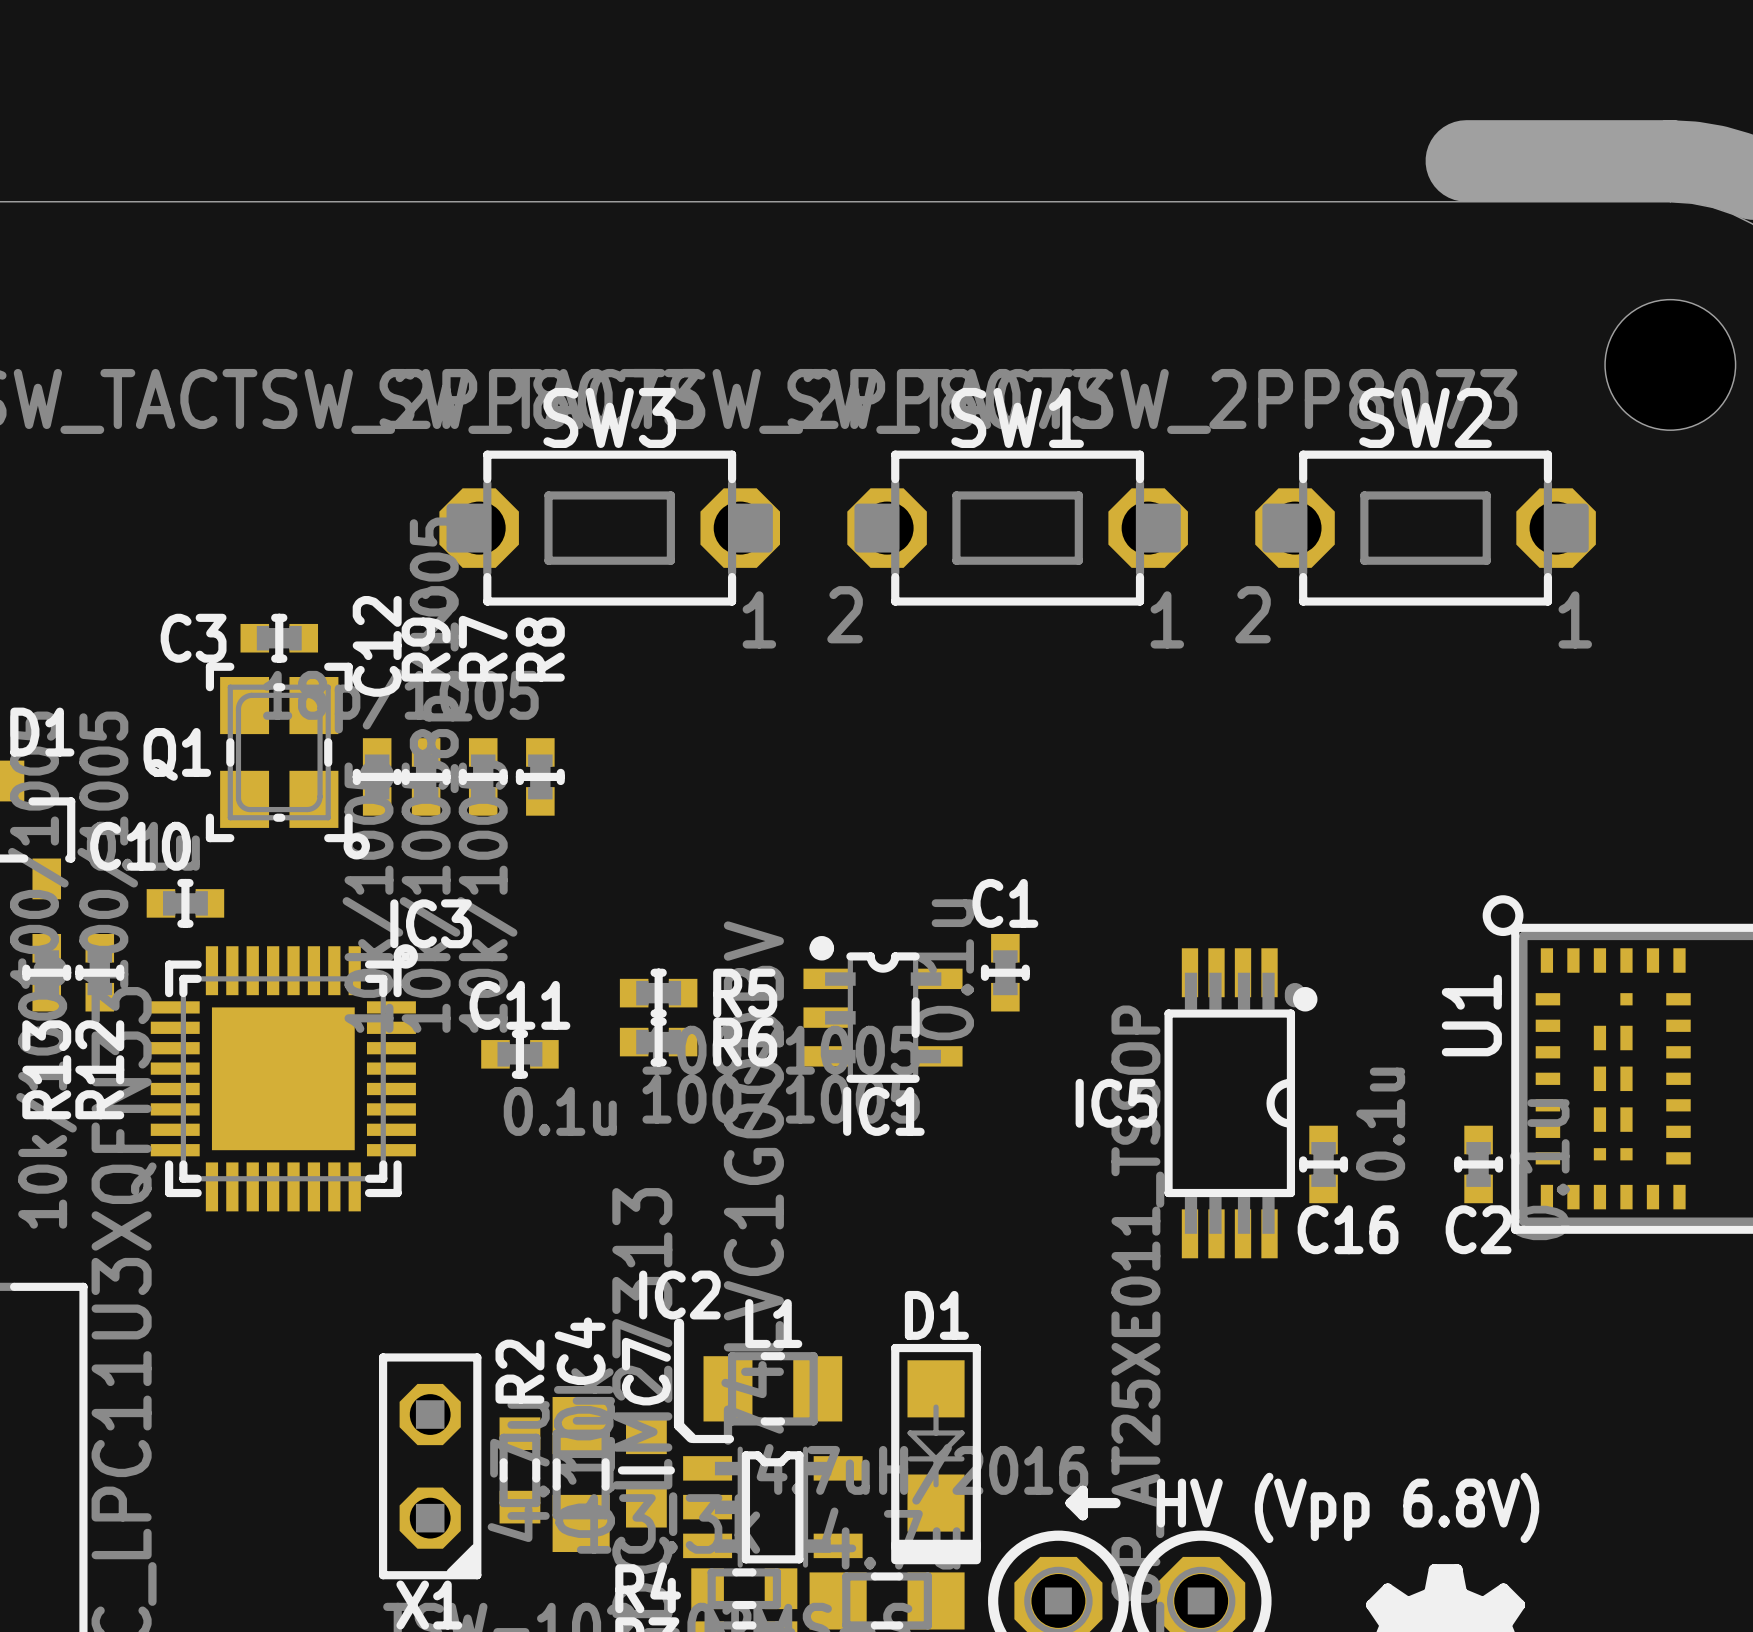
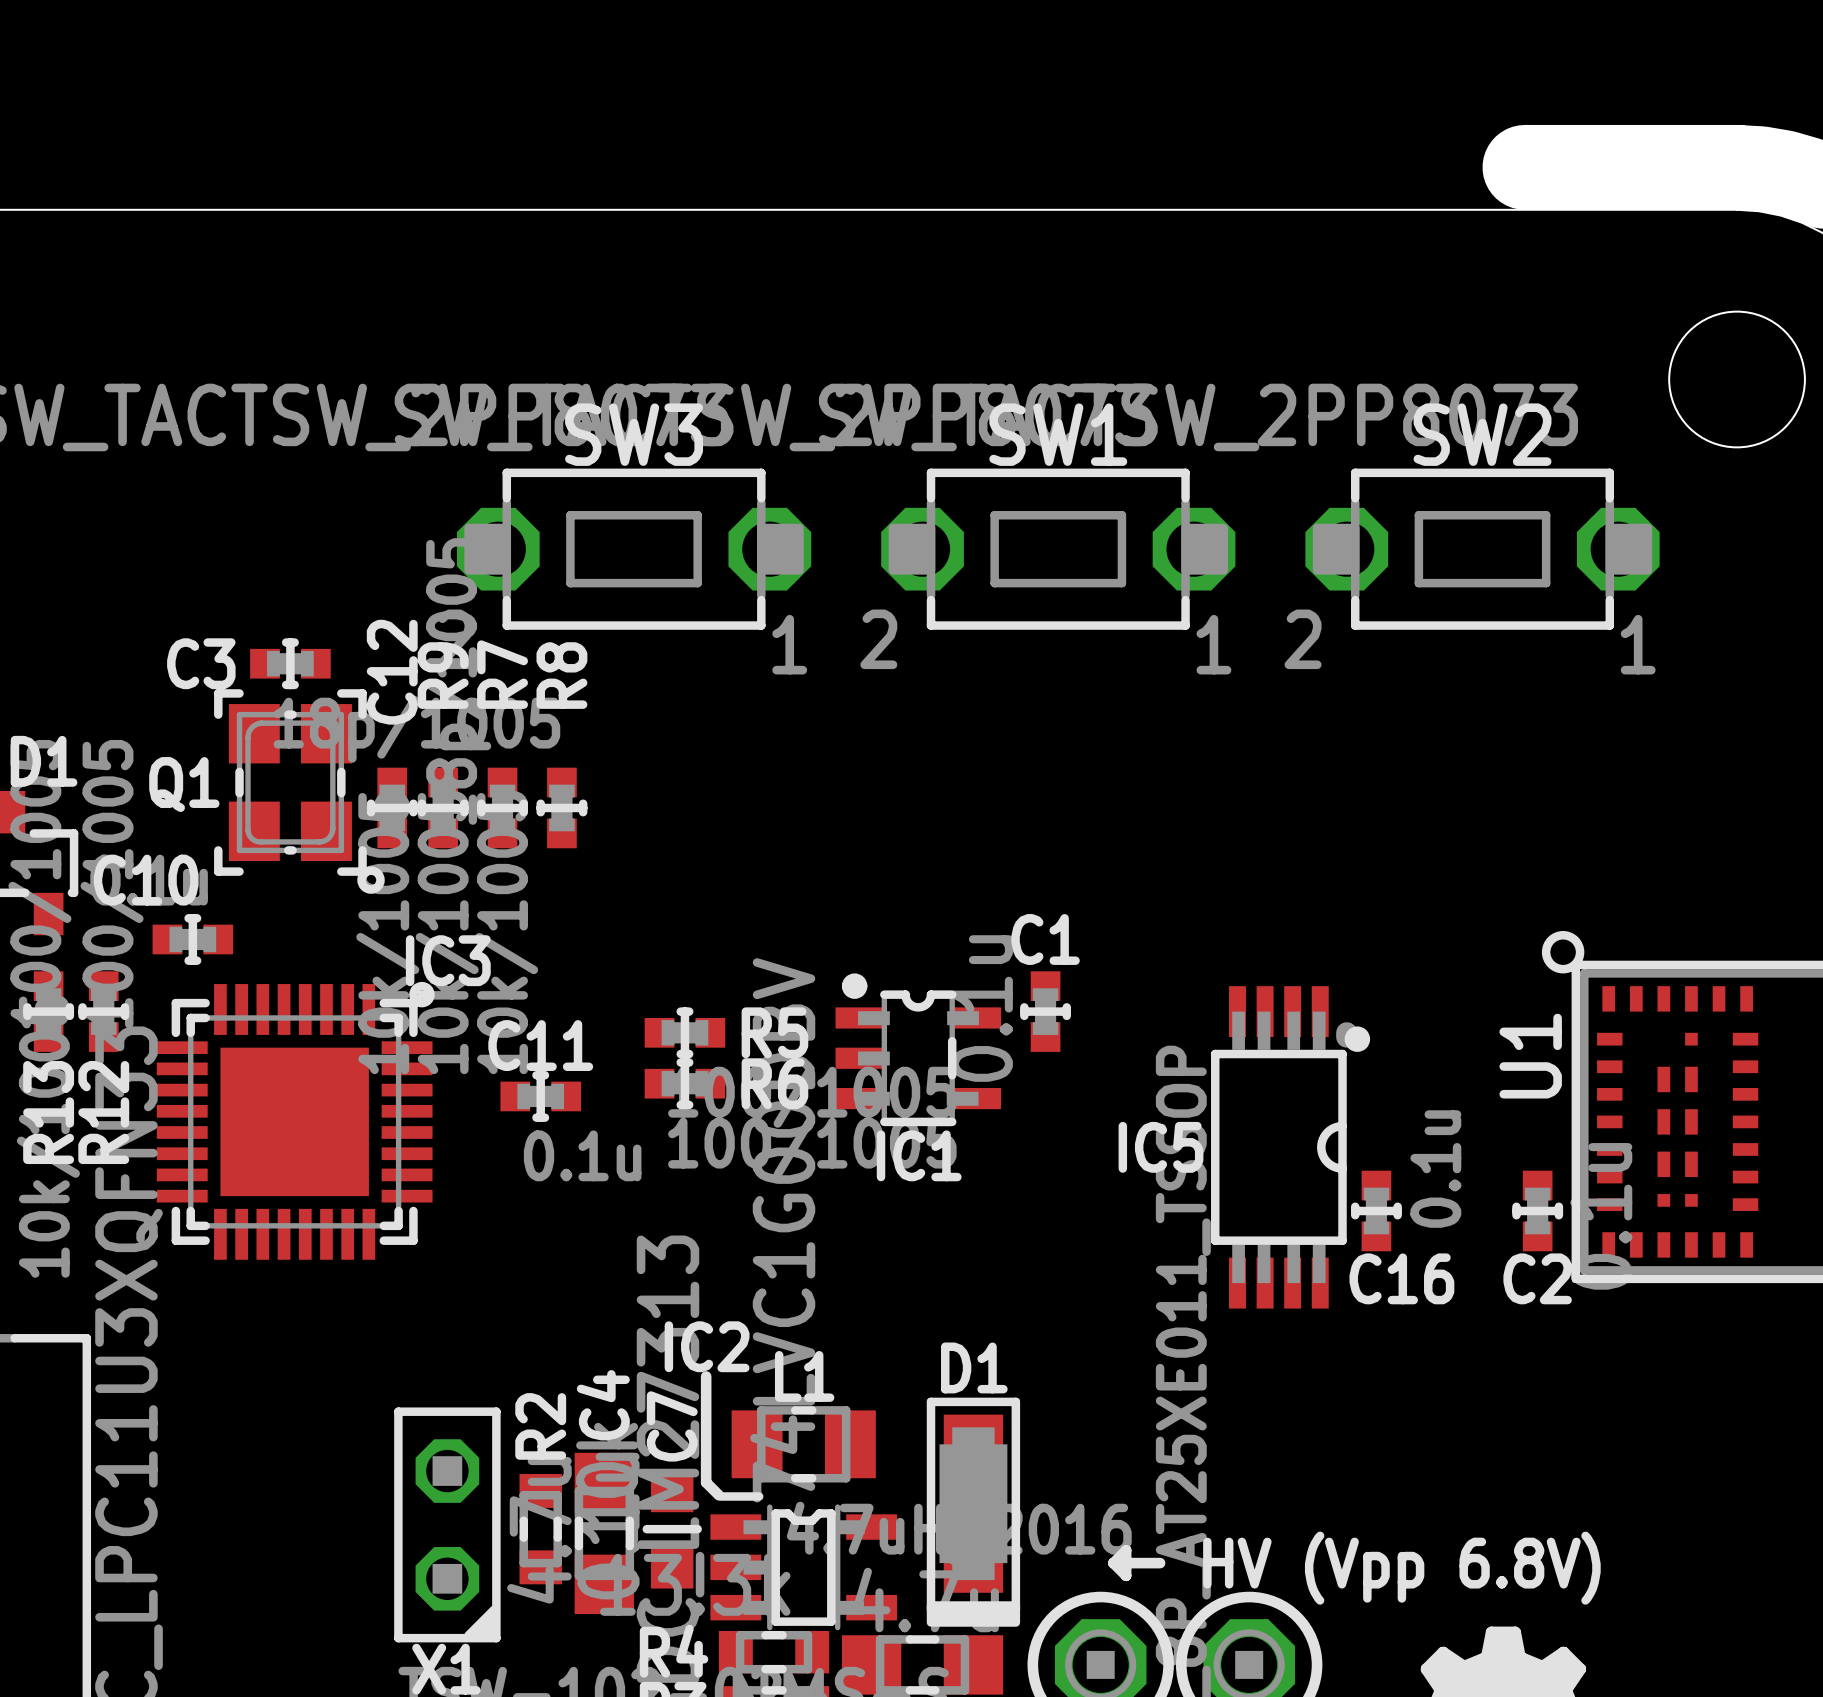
D1 footprint: [891, 1343, 981, 1565] -> [926, 1397, 1021, 1627]

